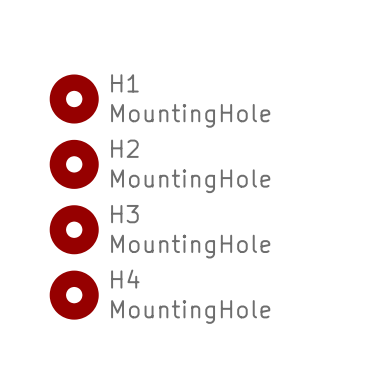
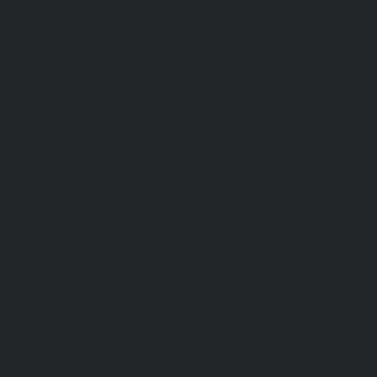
H1: MountingHole (74, 99) -> none
H2: MountingHole (74, 164) -> none
H3: MountingHole (74, 229) -> none
H4: MountingHole (74, 295) -> none

